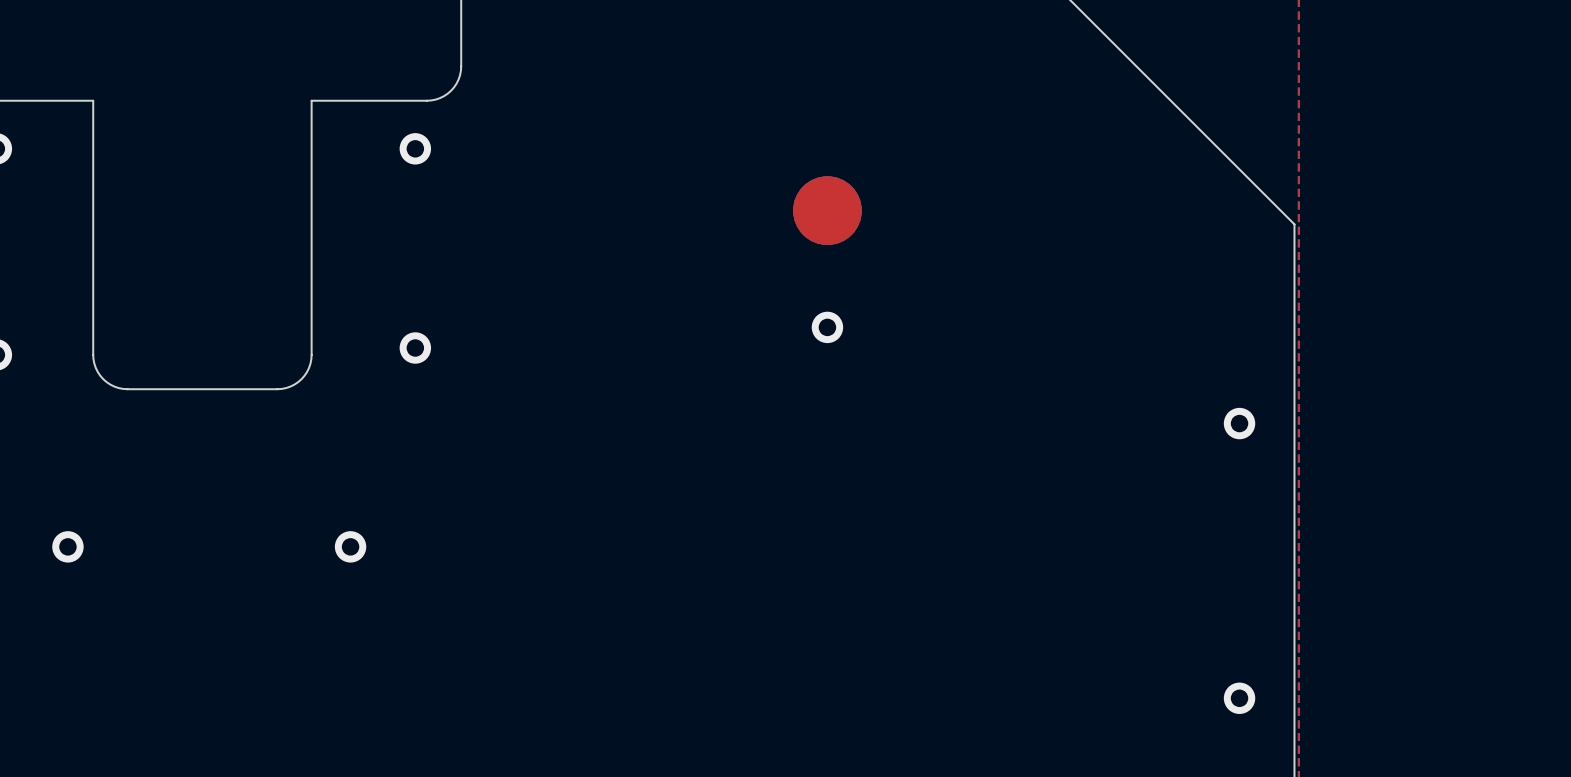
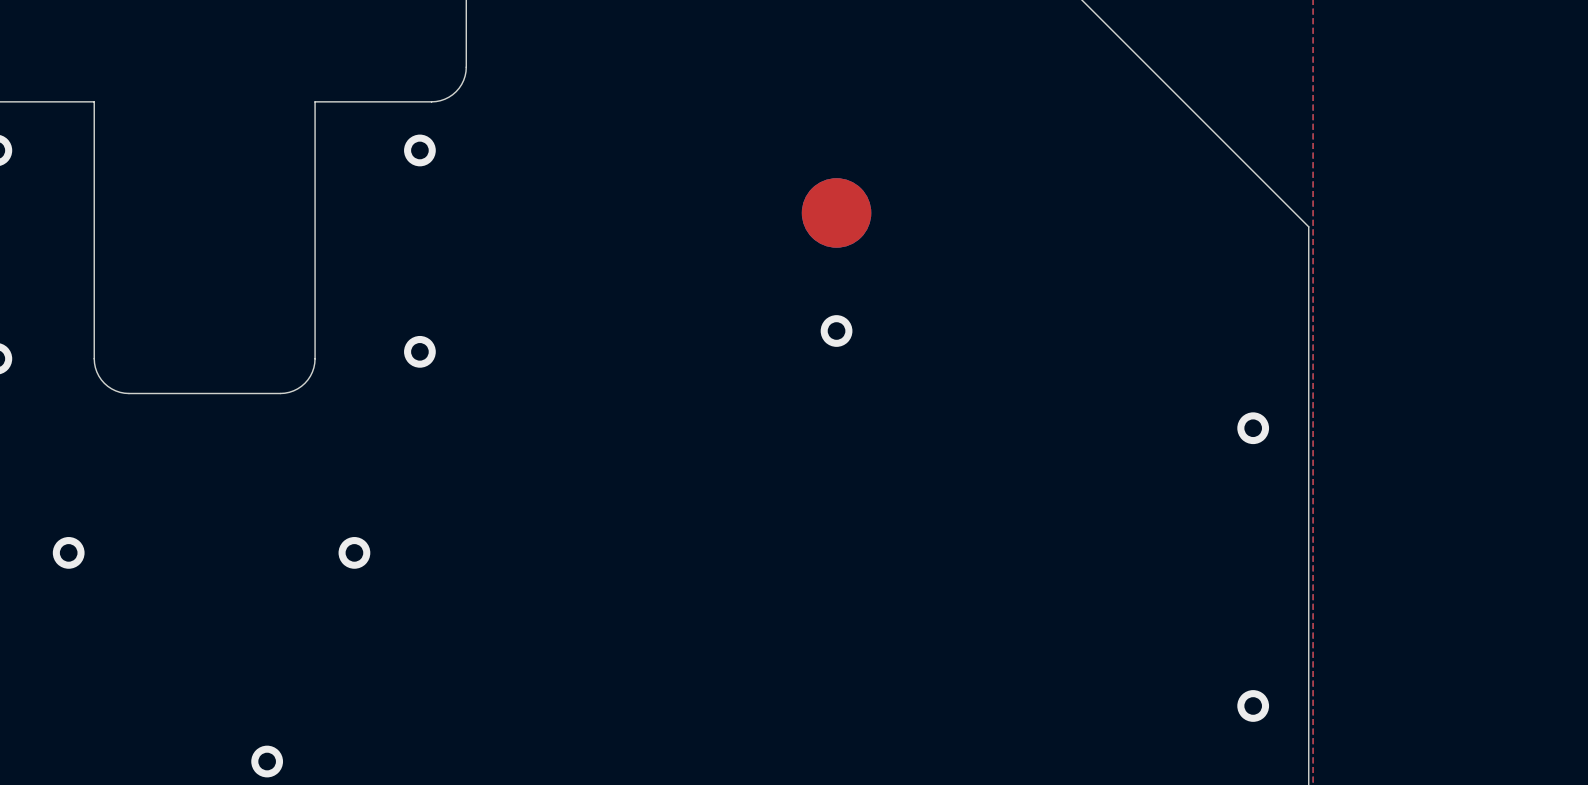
via: none -> (267, 761)

